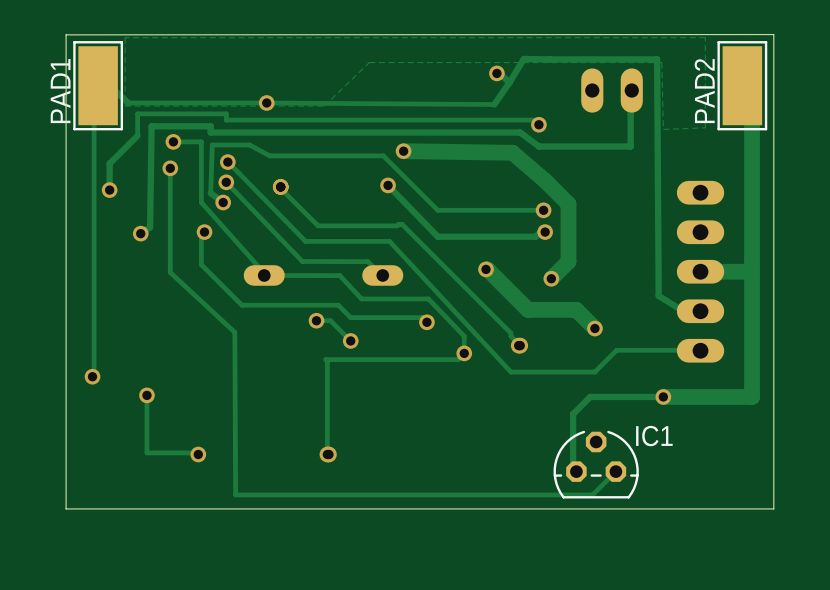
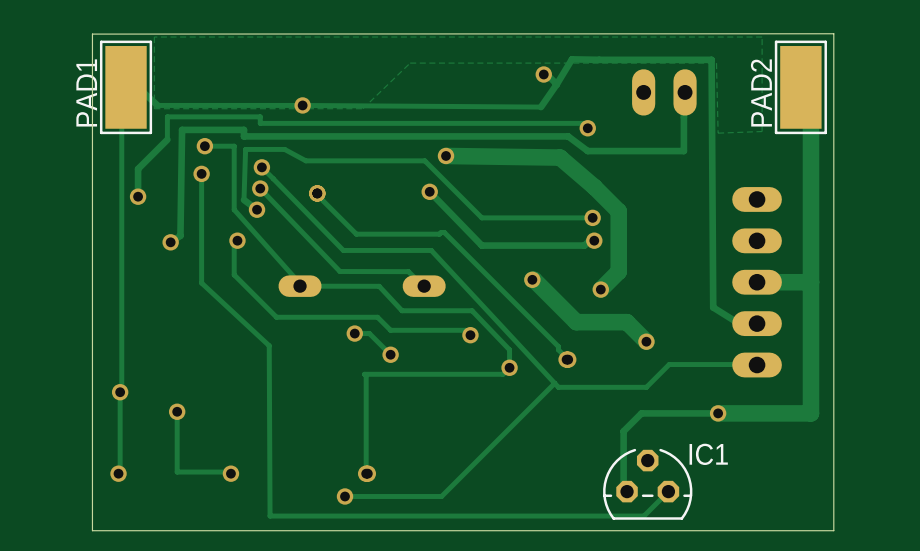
track: none -> (554, 383) (441, 496) (345, 496)
track: none -> (120, 392) (120, 473) (118, 473)
via: none -> (118, 473)
via: none -> (345, 496)

